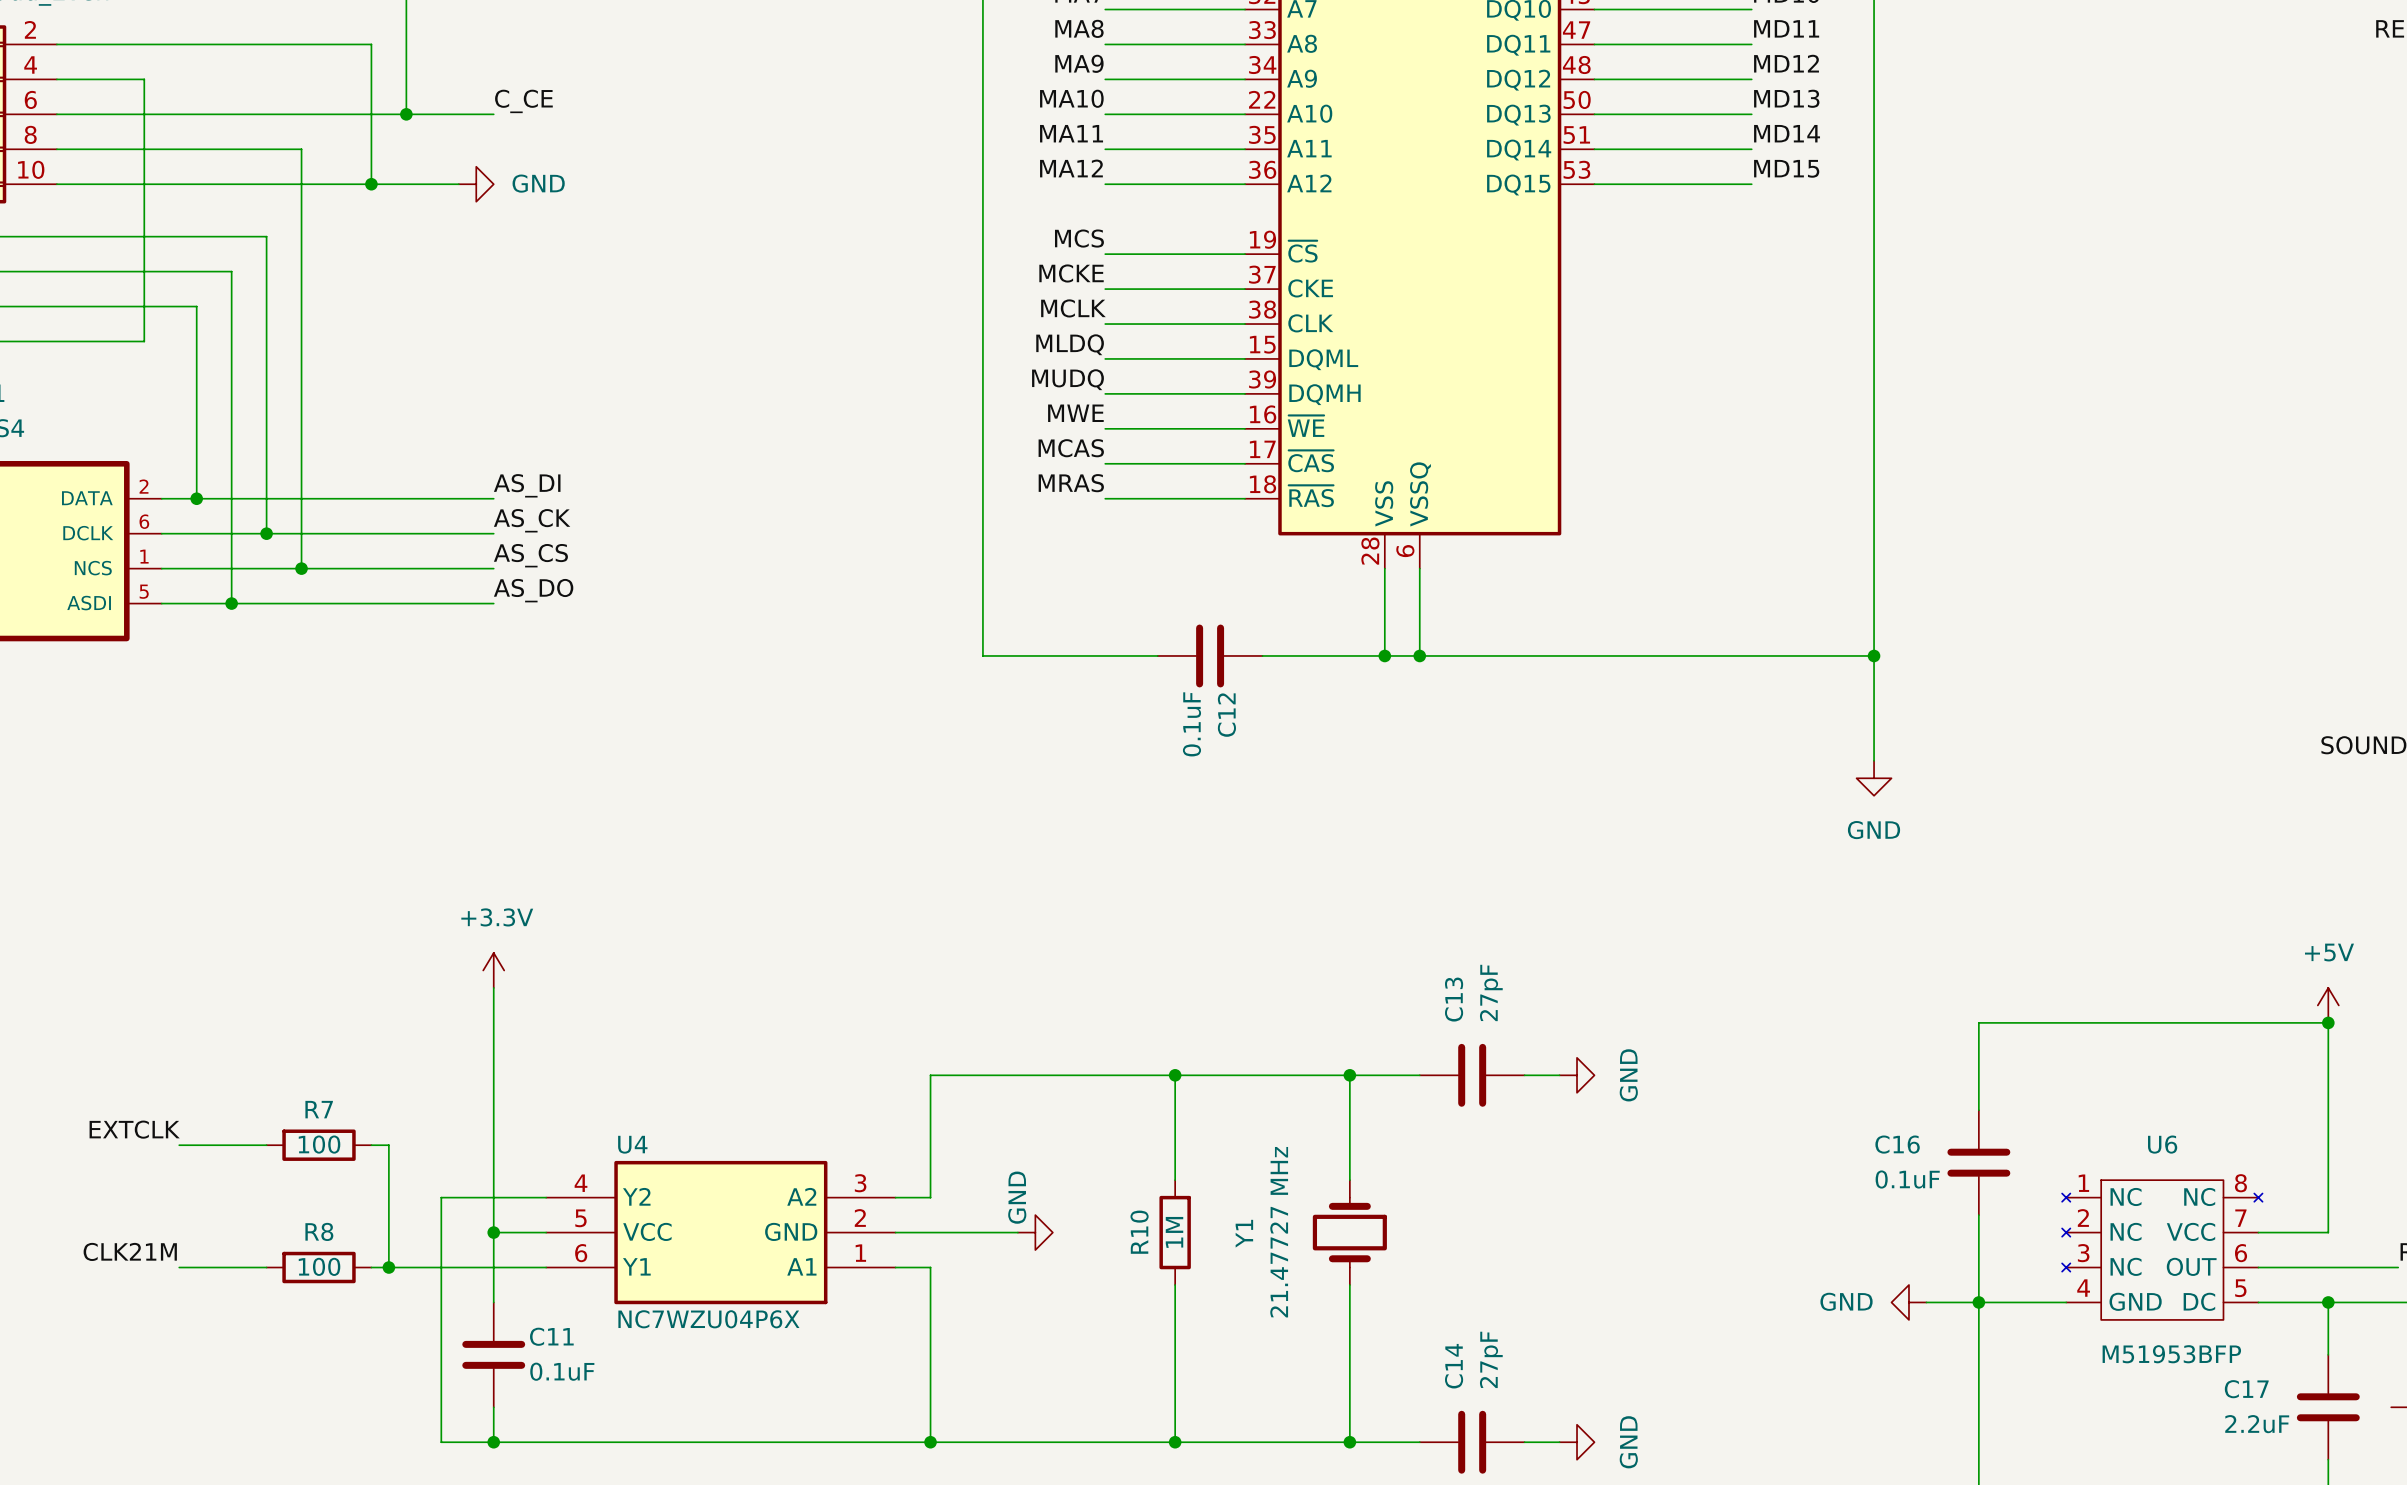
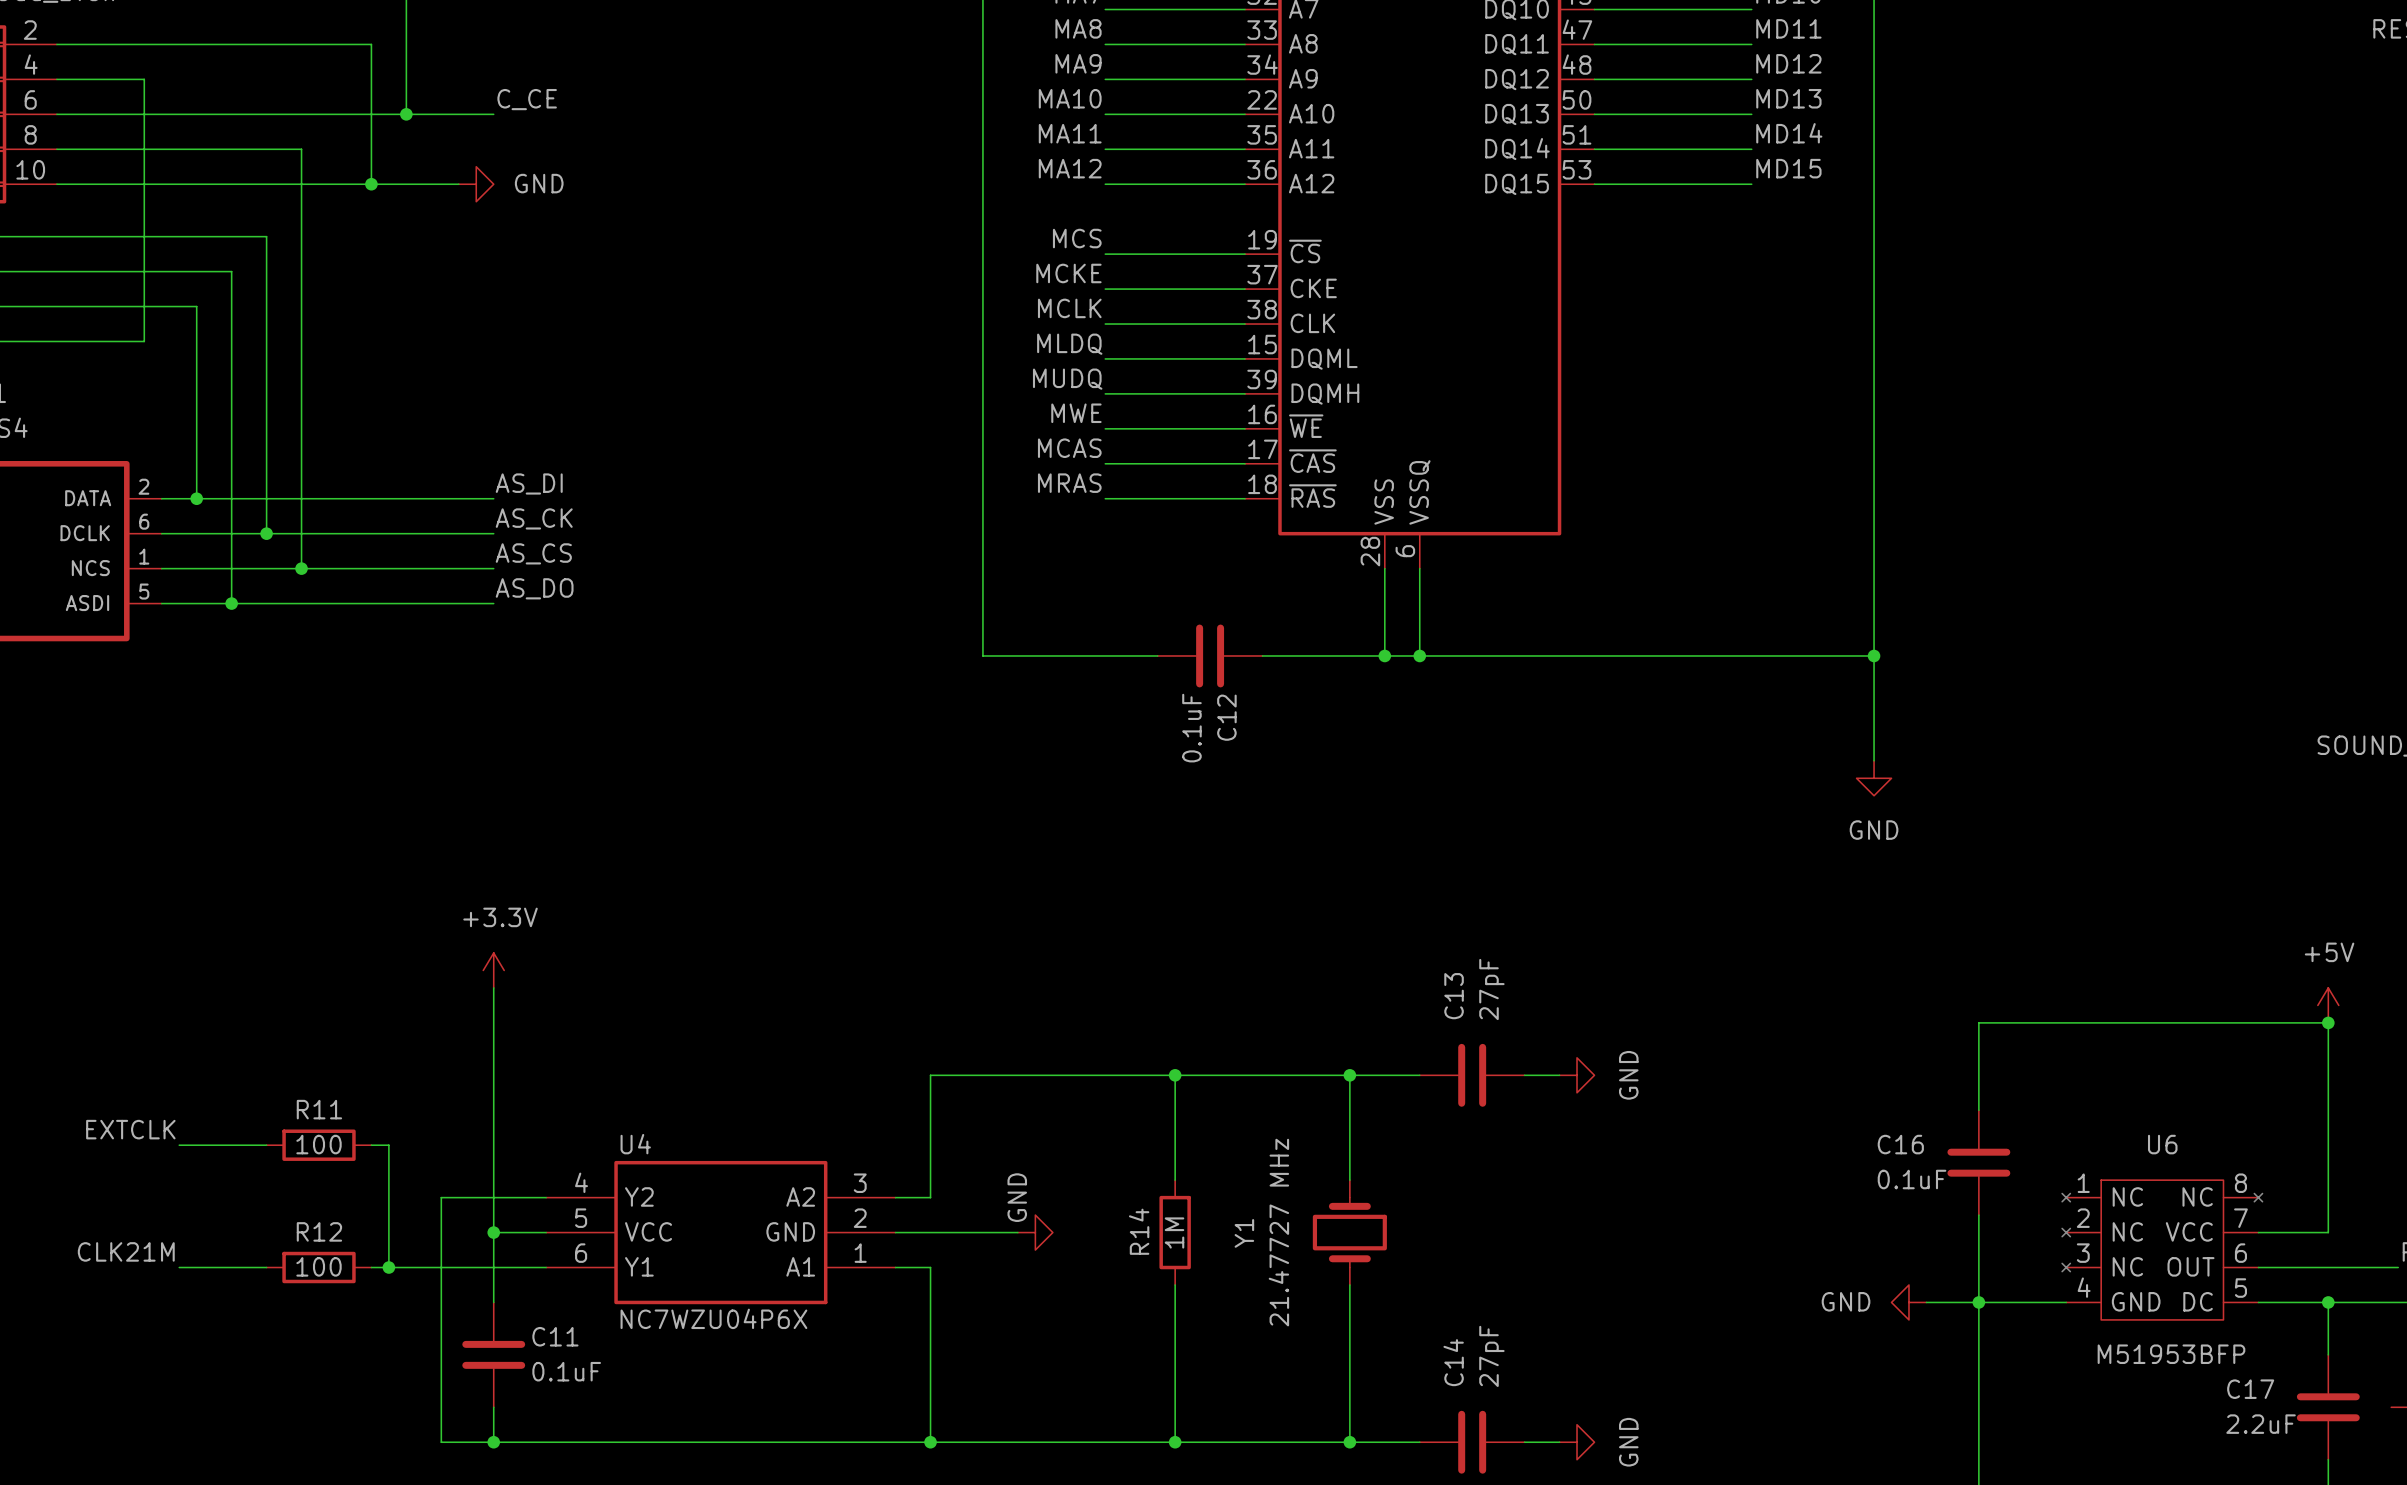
R7 name: R7 (319, 1109) -> R11 (319, 1109)
R8 name: R8 (319, 1231) -> R12 (319, 1231)
R10 name: R10 (1139, 1232) -> R14 (1139, 1231)

